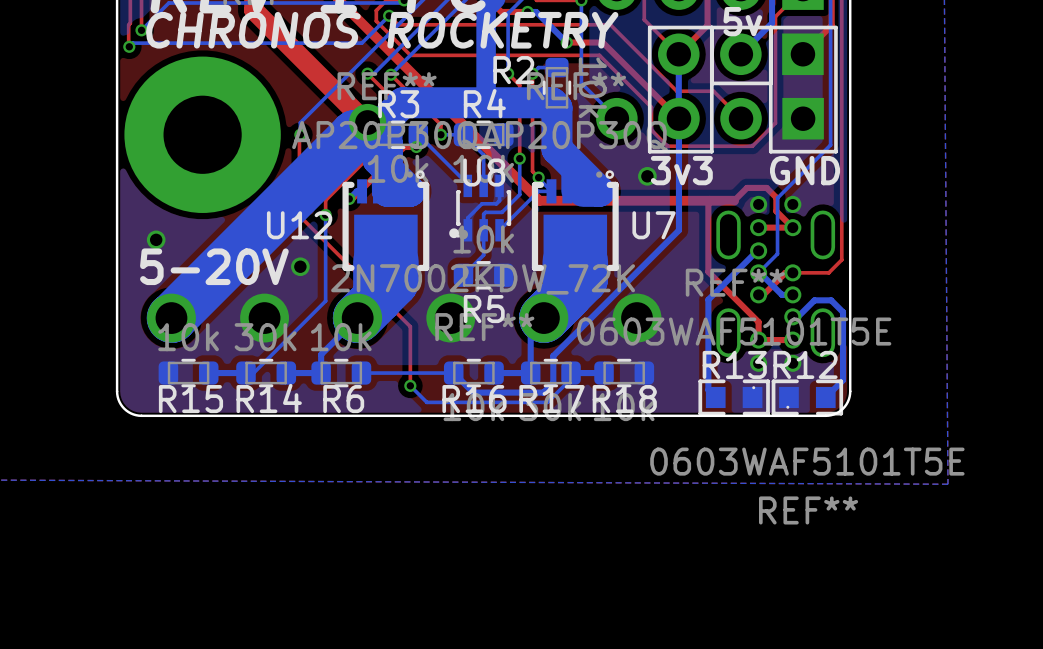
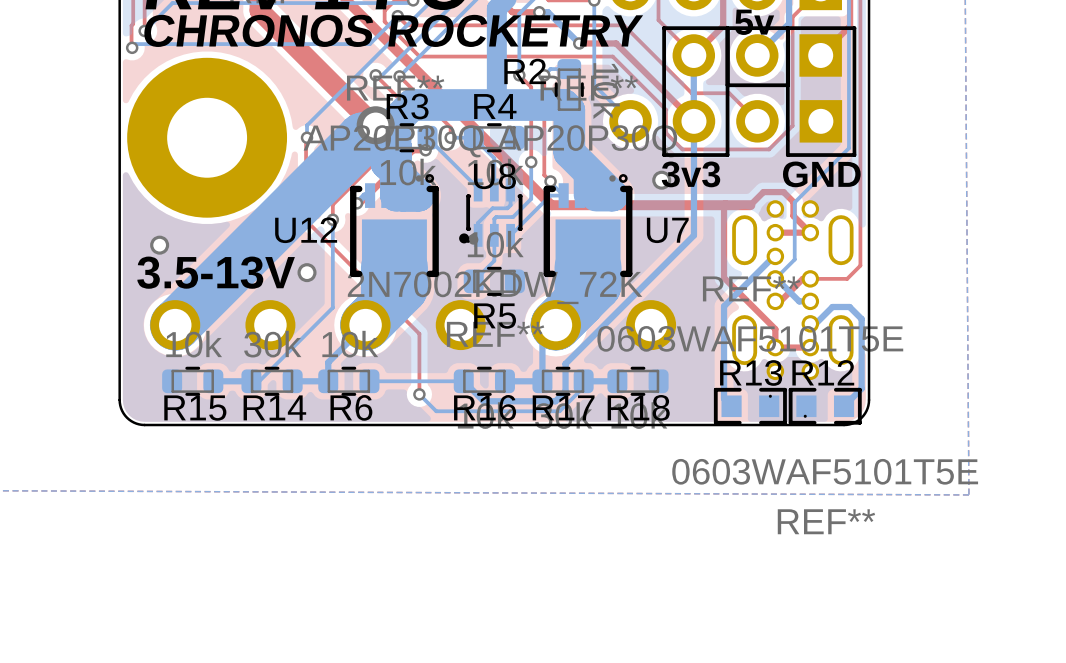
text: 5-20V (214, 266) -> 3.5-13V (216, 272)

